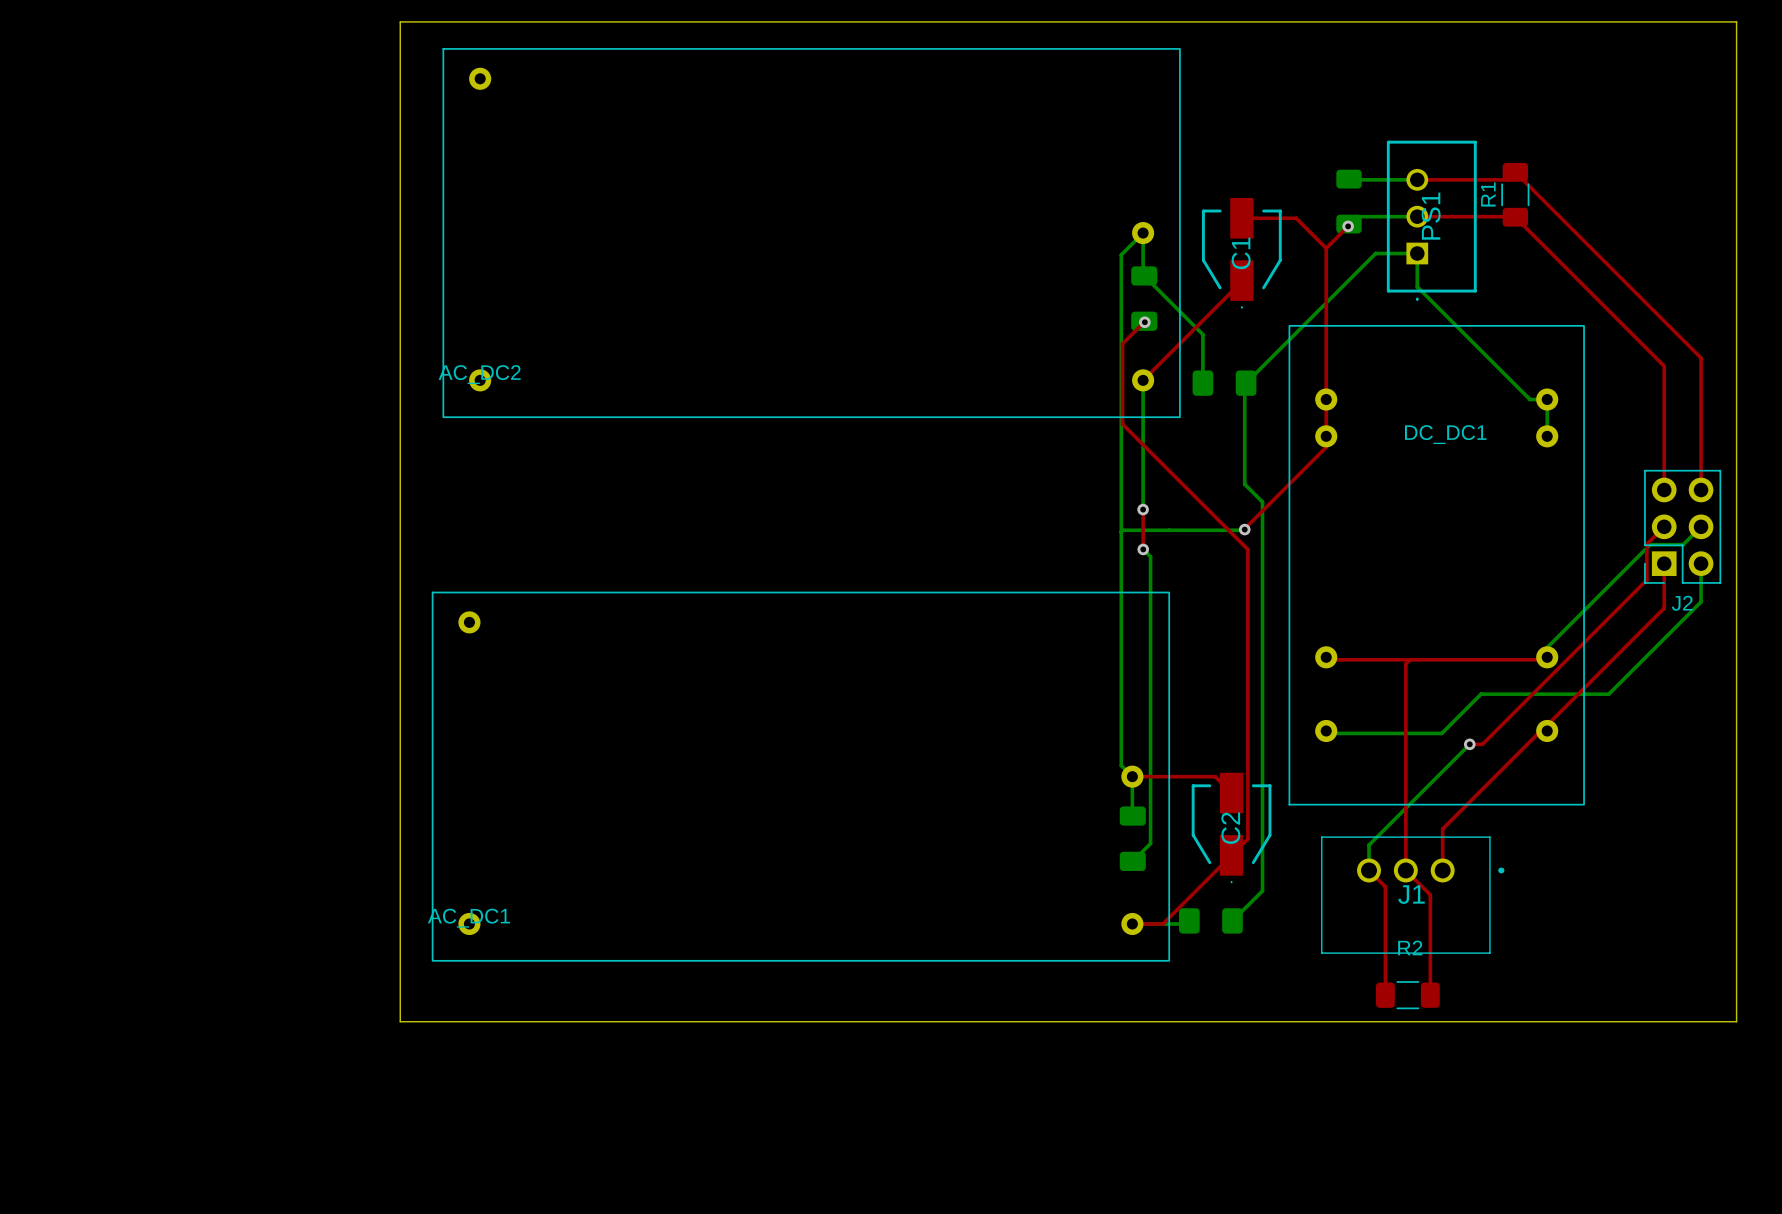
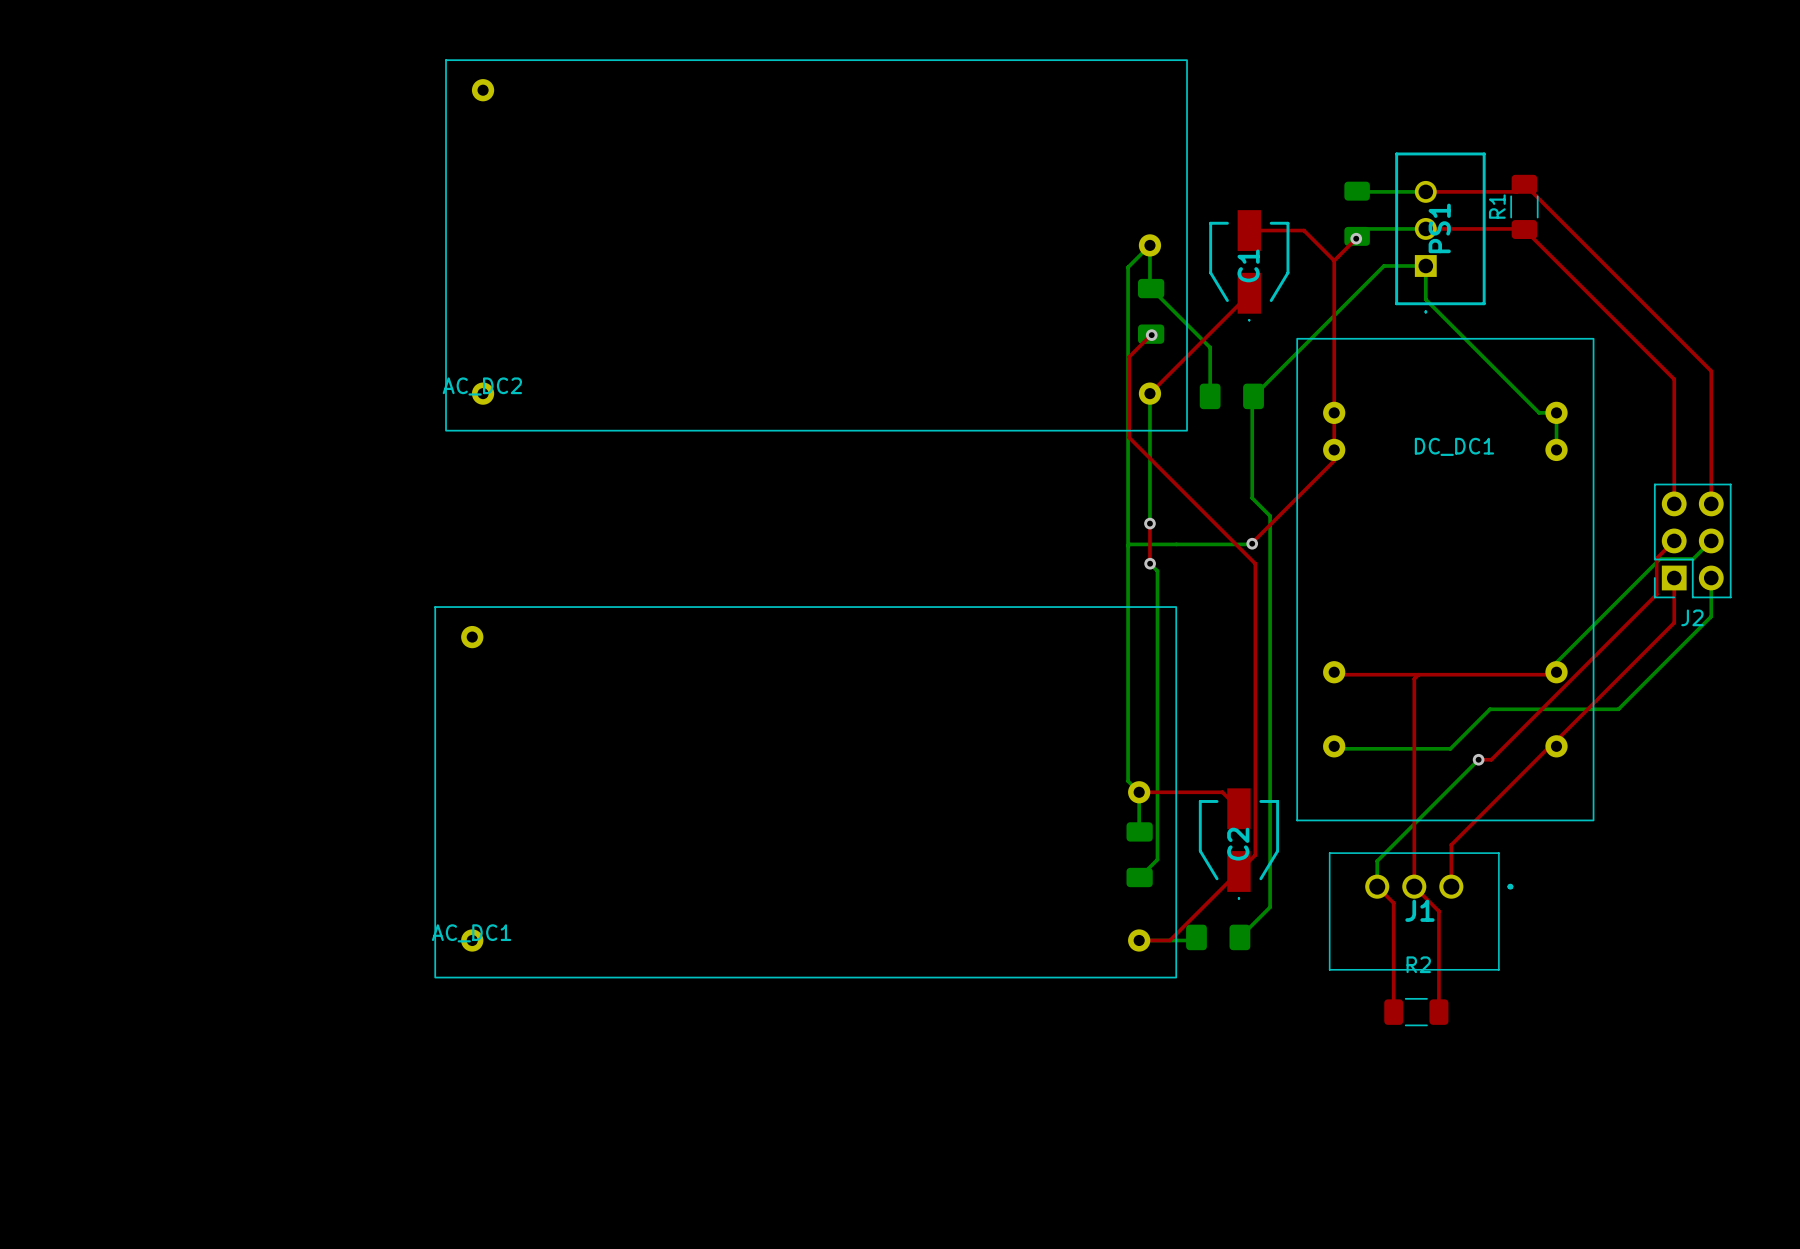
board edge: (400, 21) (1736, 21) (1736, 1021) (400, 1021) (400, 21) -> none

